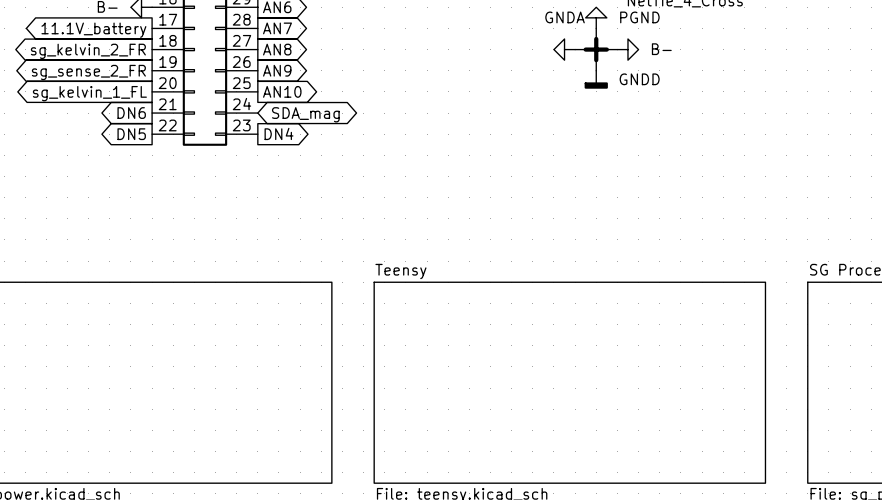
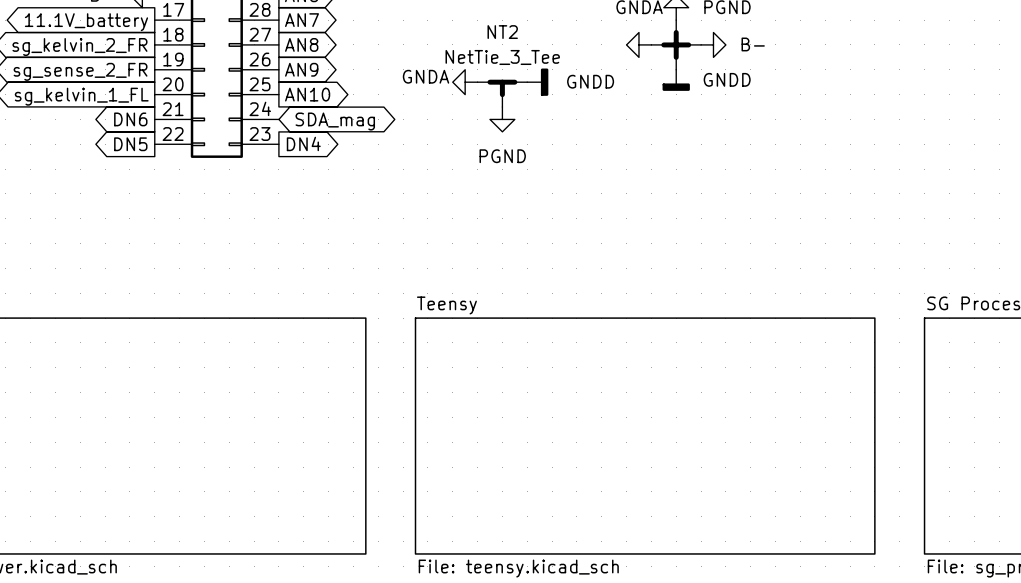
power symbol: none -> GNDA (465, 82)
power symbol: none -> GNDD (537, 82)
NT2: none -> NetTie_3_Tee (502, 93)
power symbol: none -> PGND (502, 119)

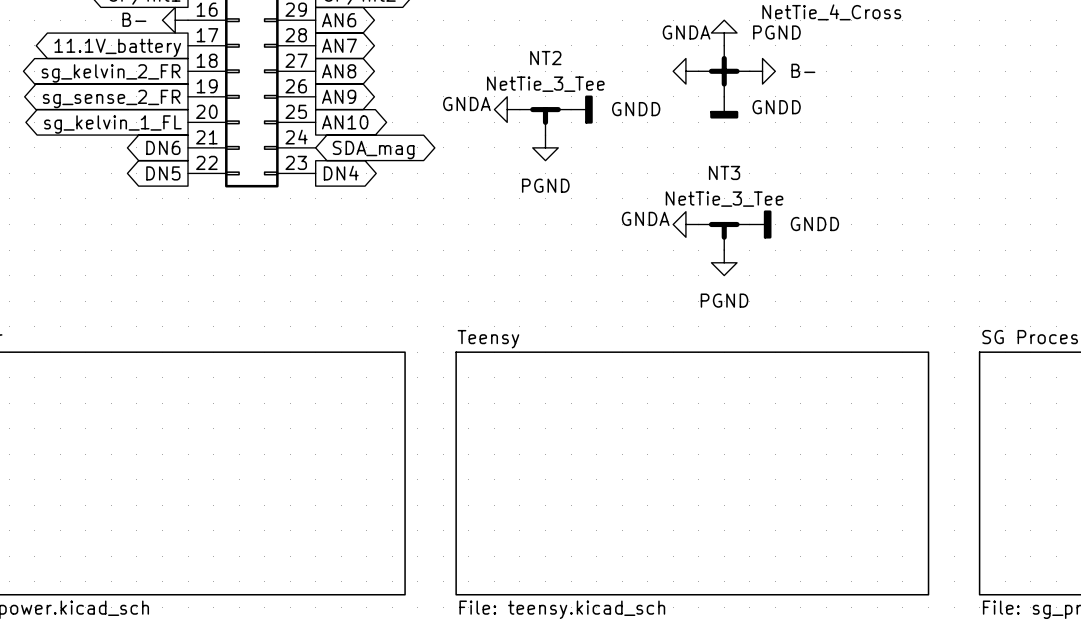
power symbol: none -> GNDA (685, 224)
power symbol: none -> GNDD (760, 224)
NT3: none -> NetTie_3_Tee (724, 236)
power symbol: none -> PGND (724, 262)

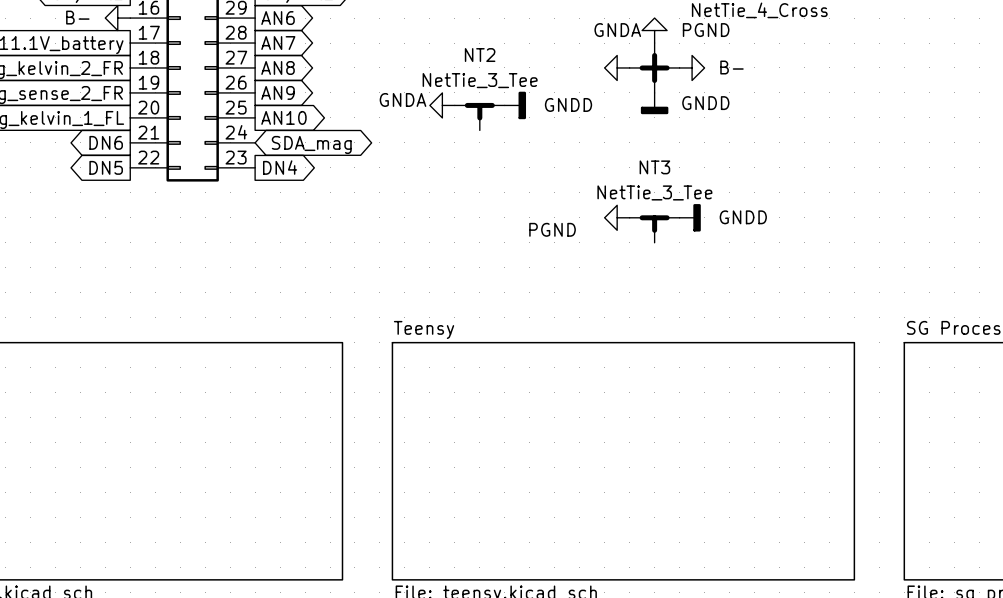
power symbol: PGND (545, 147) -> none
power symbol: GNDA (685, 224) -> PGND (617, 217)
power symbol: PGND (724, 262) -> none

